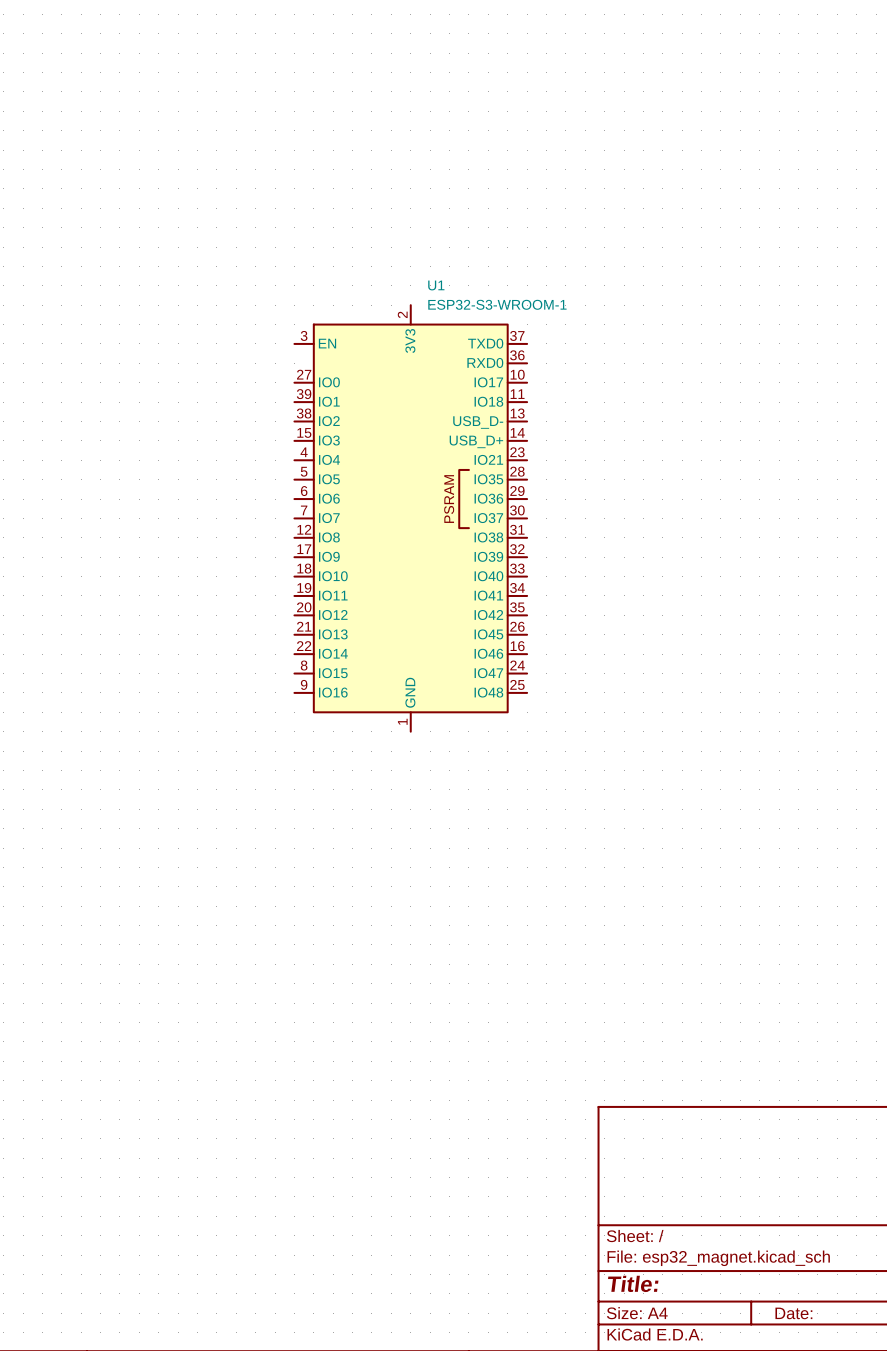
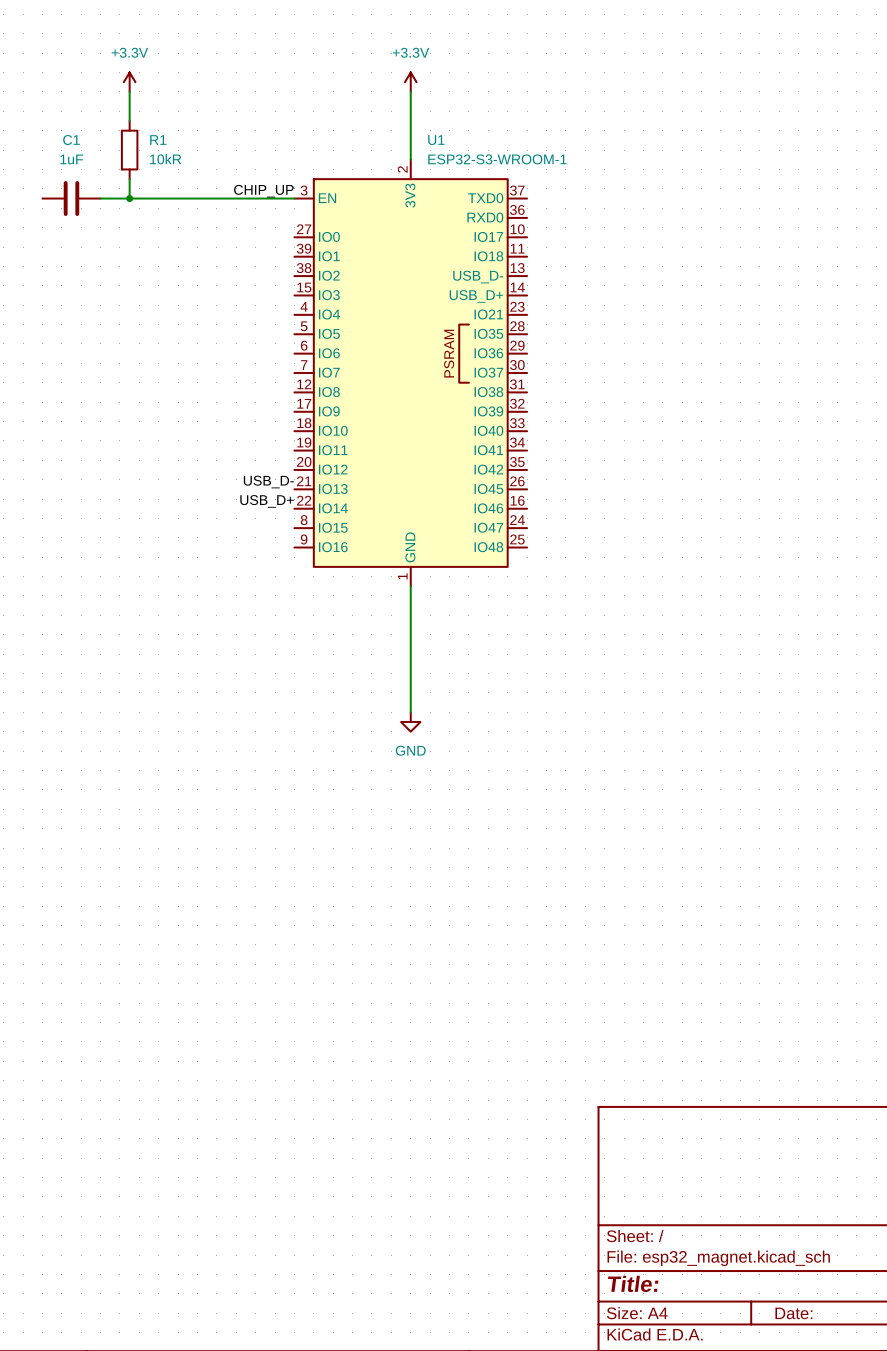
power symbol: none -> +3.3V (129, 82)
power symbol: none -> +3.3V (410, 82)
wire: none -> (129, 91) (129, 120)
wire: none -> (410, 91) (410, 159)
R1: none -> 10kR (129, 150)
wire: none -> (129, 179) (129, 198)
label: none -> CHIP_UP (263, 191)
C1: none -> 1uF (71, 198)
wire: none -> (100, 198) (294, 198)
junction: none -> (129, 198)
label: none -> USB_D- (268, 482)
label: none -> USB_D+ (267, 501)
U1 position: (410, 518) -> (410, 373)
power symbol: none -> GND (410, 722)

